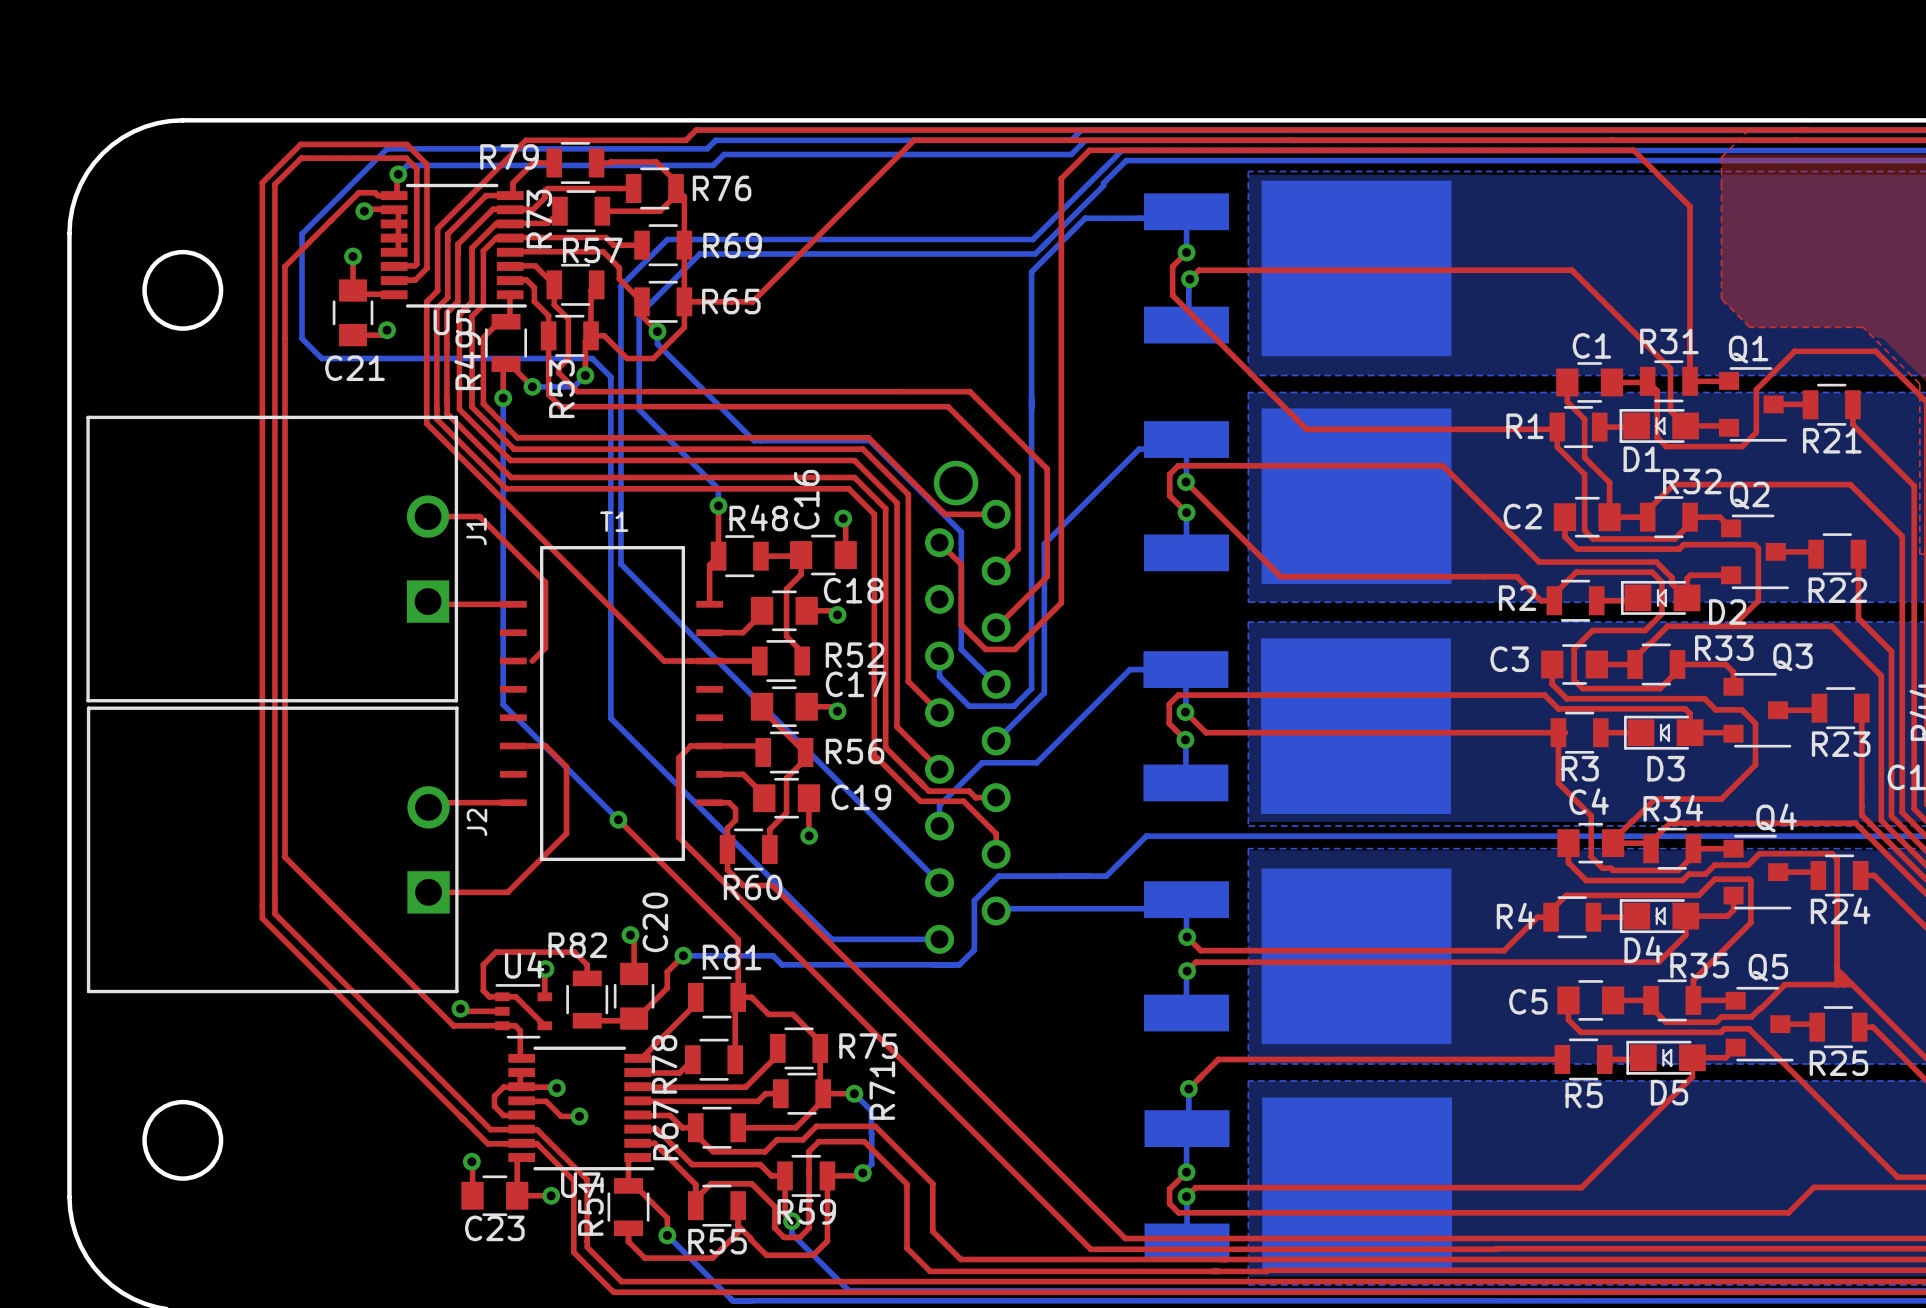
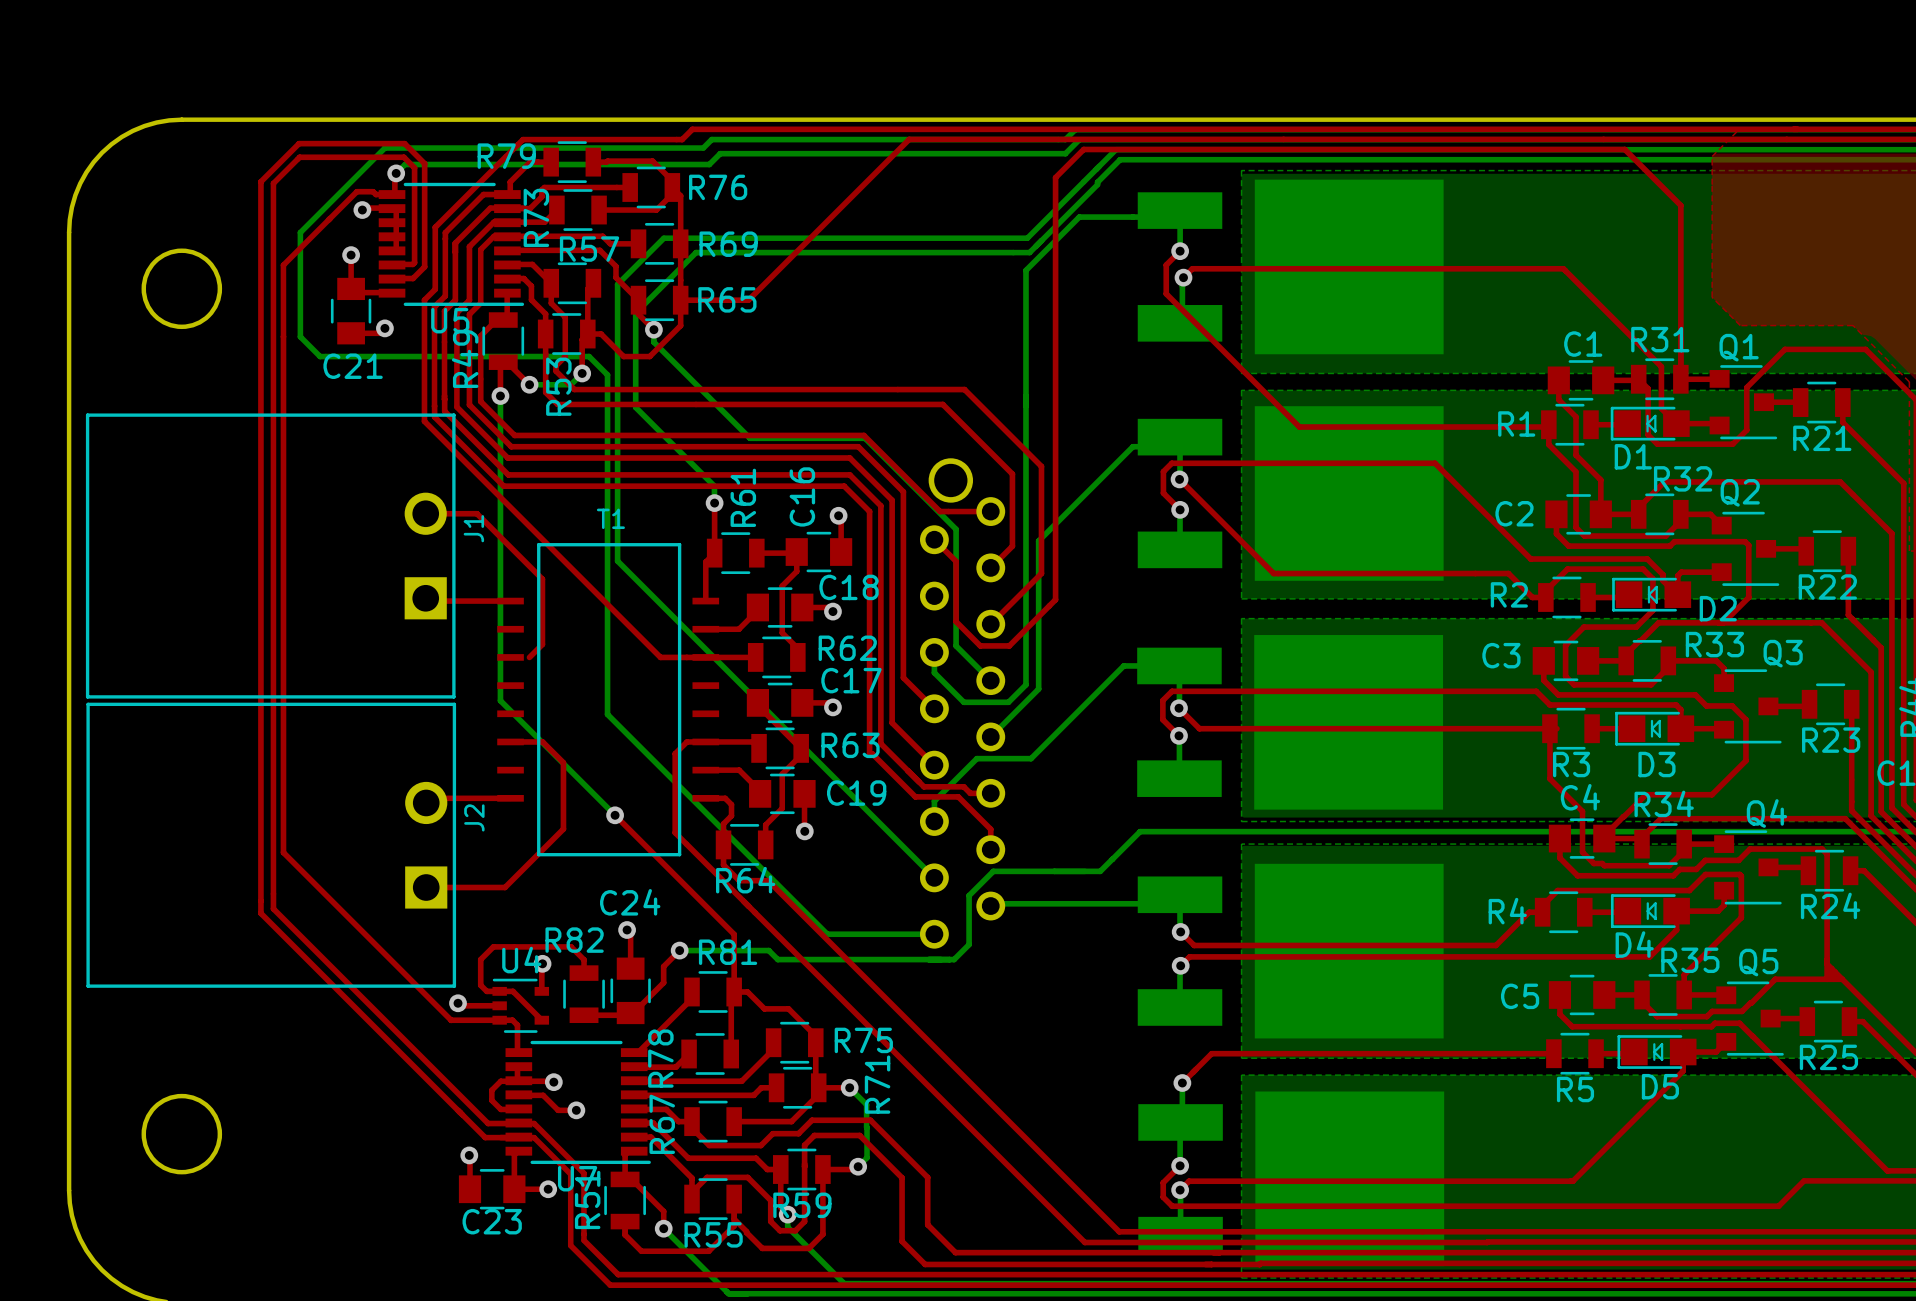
R48 name: R48 (758, 517) -> R61 (743, 497)
R52 name: R52 (855, 655) -> R62 (847, 648)
R56 name: R56 (855, 751) -> R63 (850, 745)
R60 name: R60 (753, 887) -> R64 (745, 880)
C20 name: C20 (655, 922) -> C24 (630, 902)

